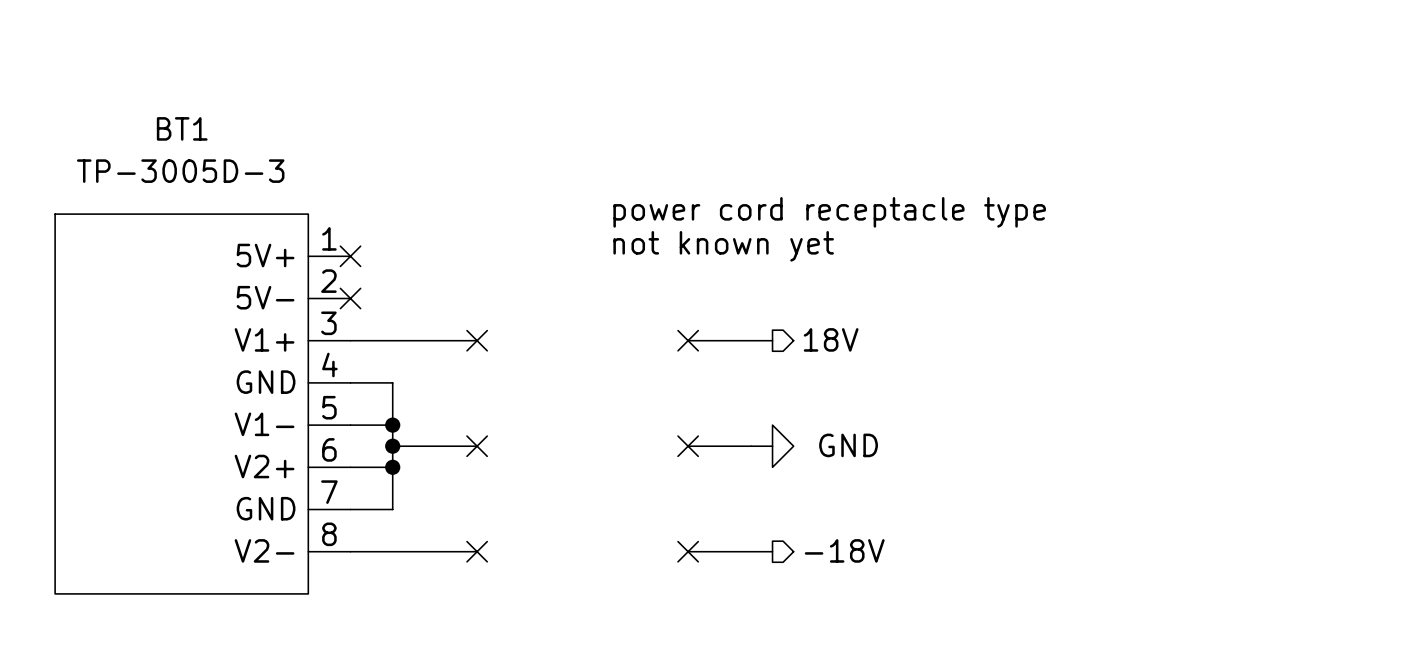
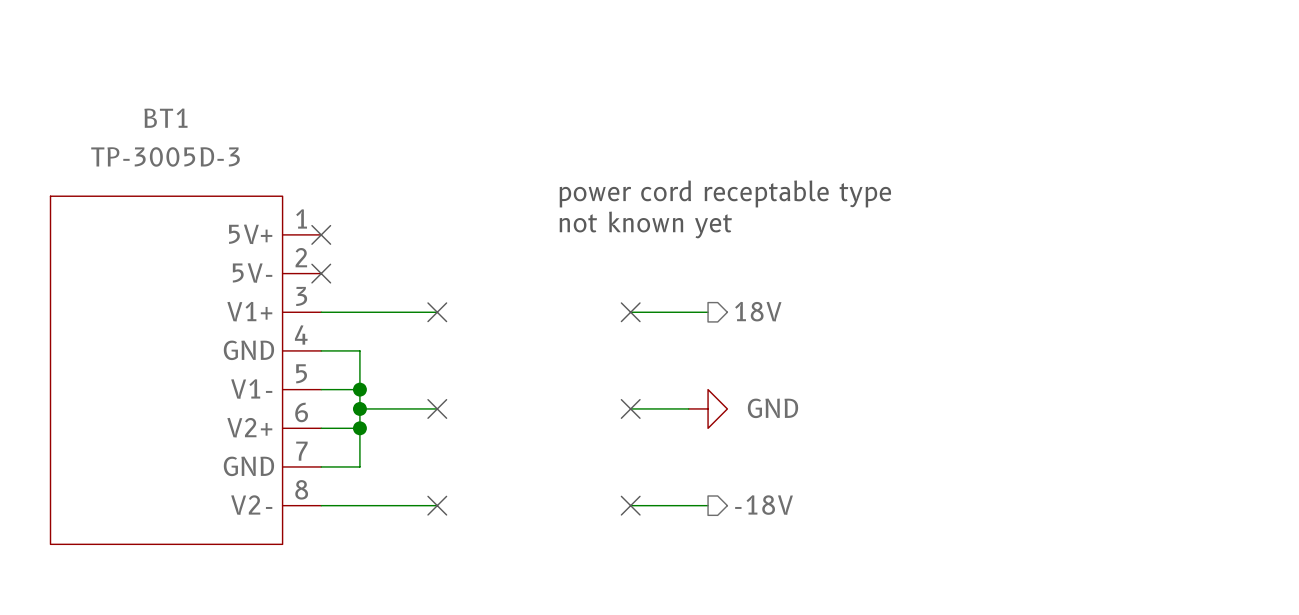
text: power cord receptacle type (829, 212) -> power cord receptable type (725, 193)

